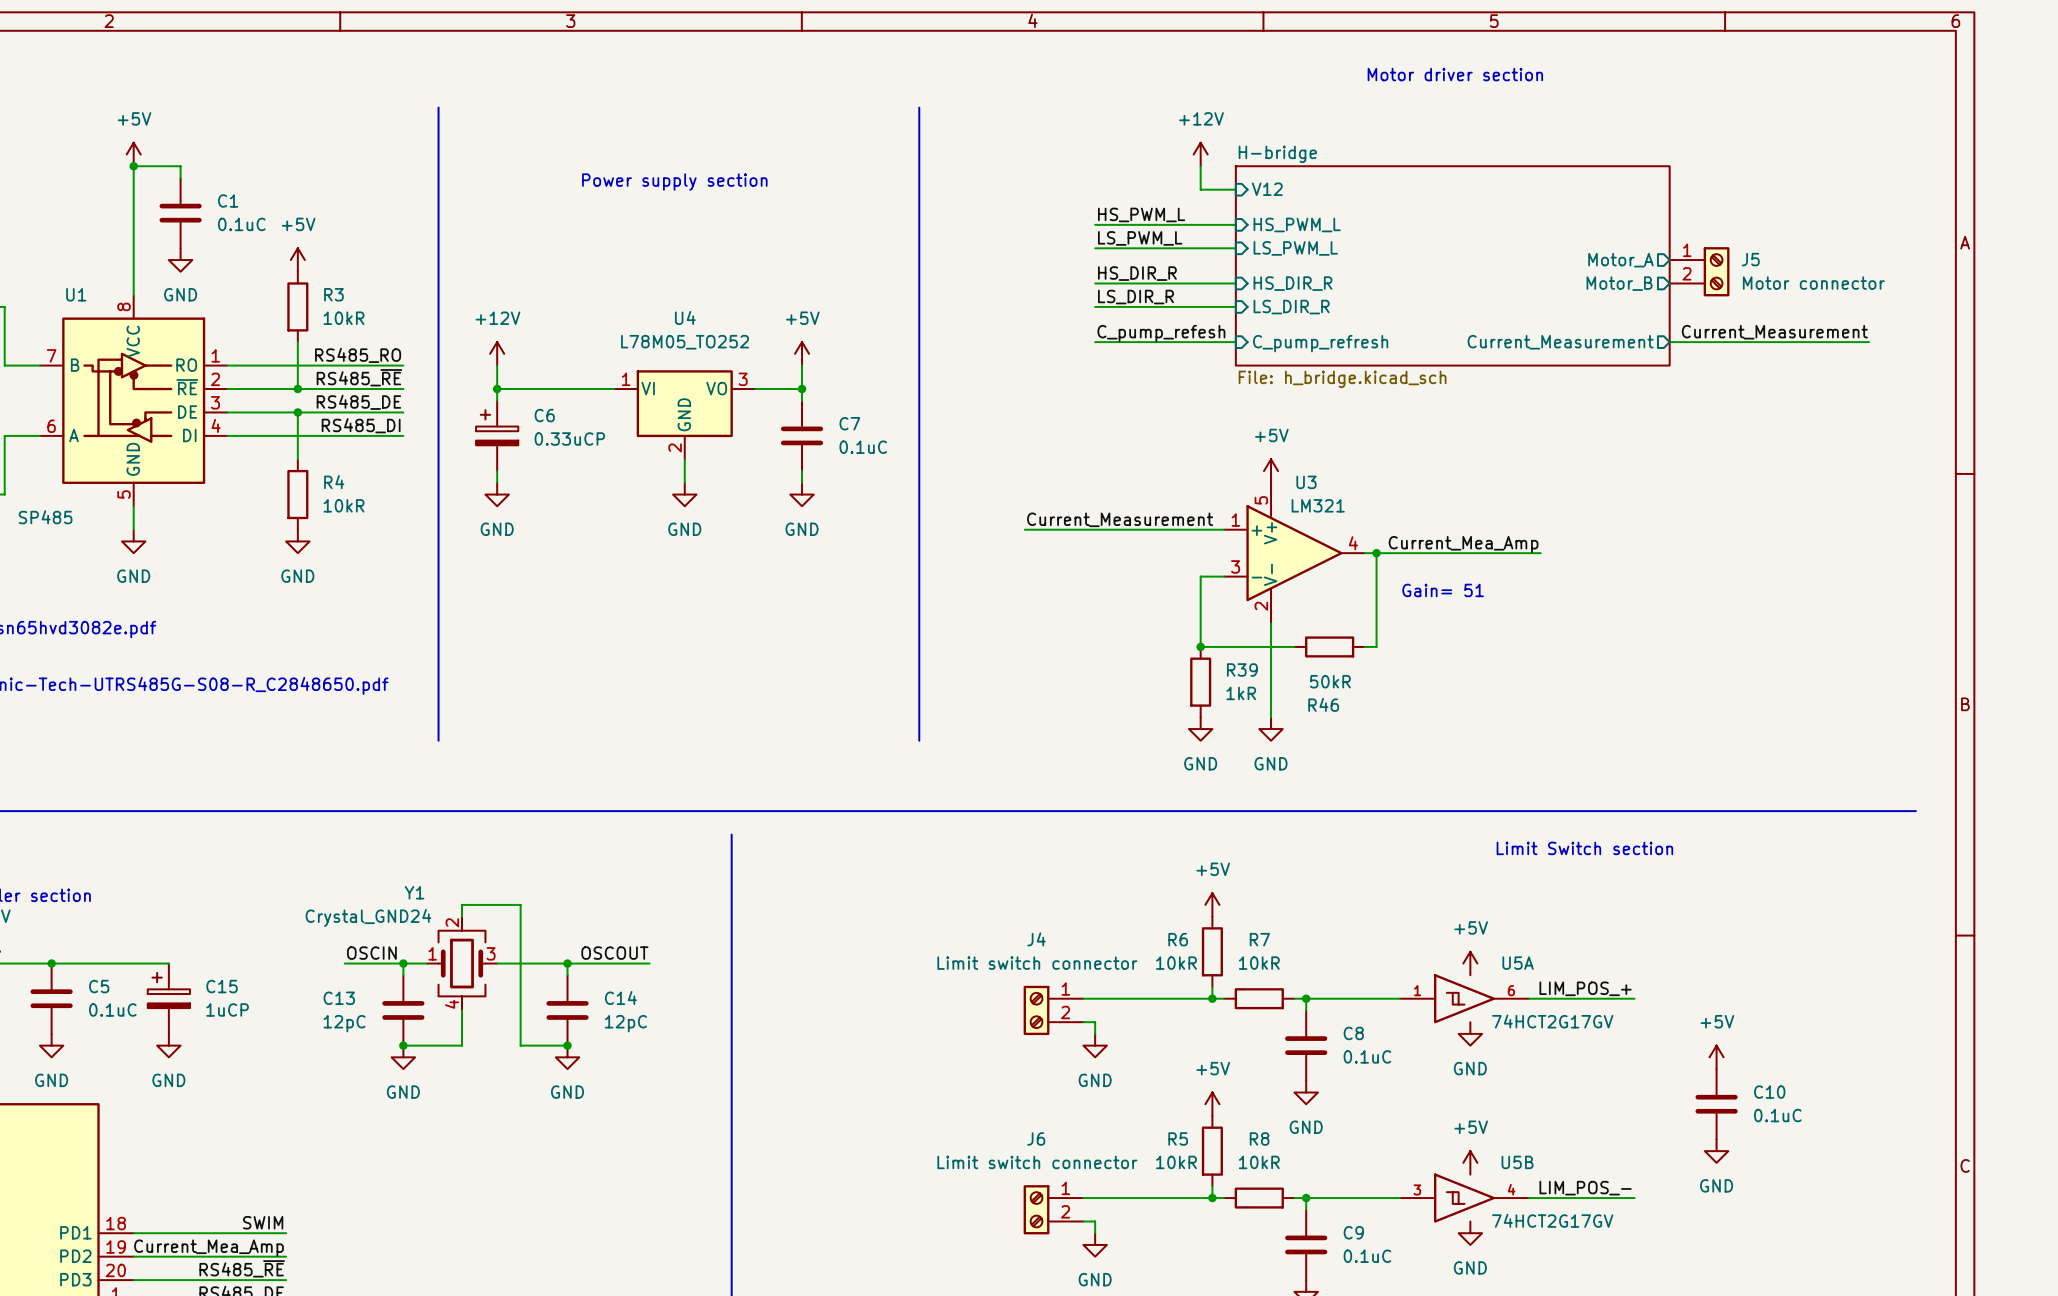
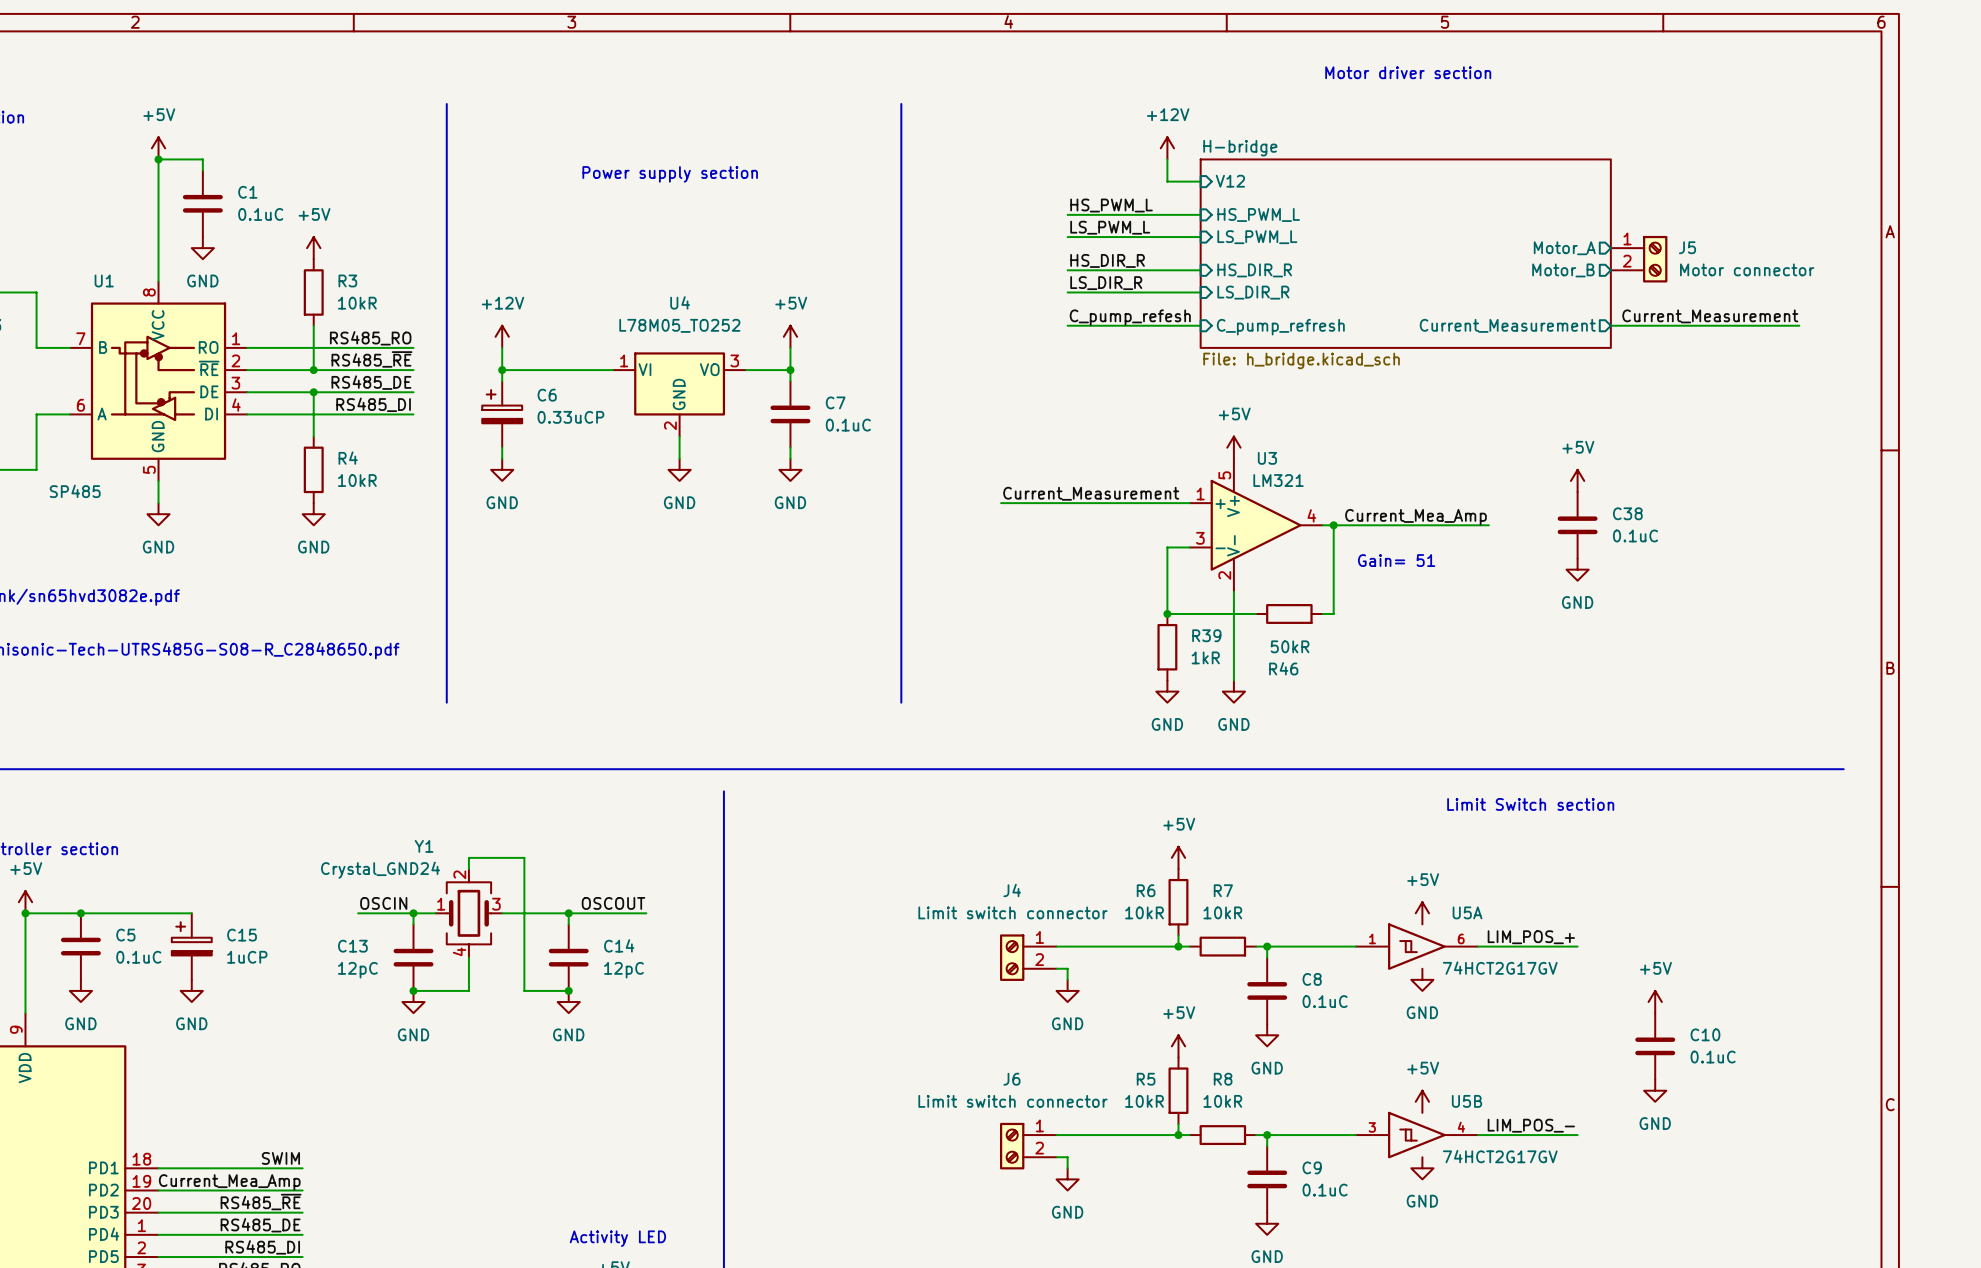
power symbol: none -> +5V (1577, 480)
C38: none -> 0.1uC (1577, 525)
power symbol: none -> GND (1577, 569)

